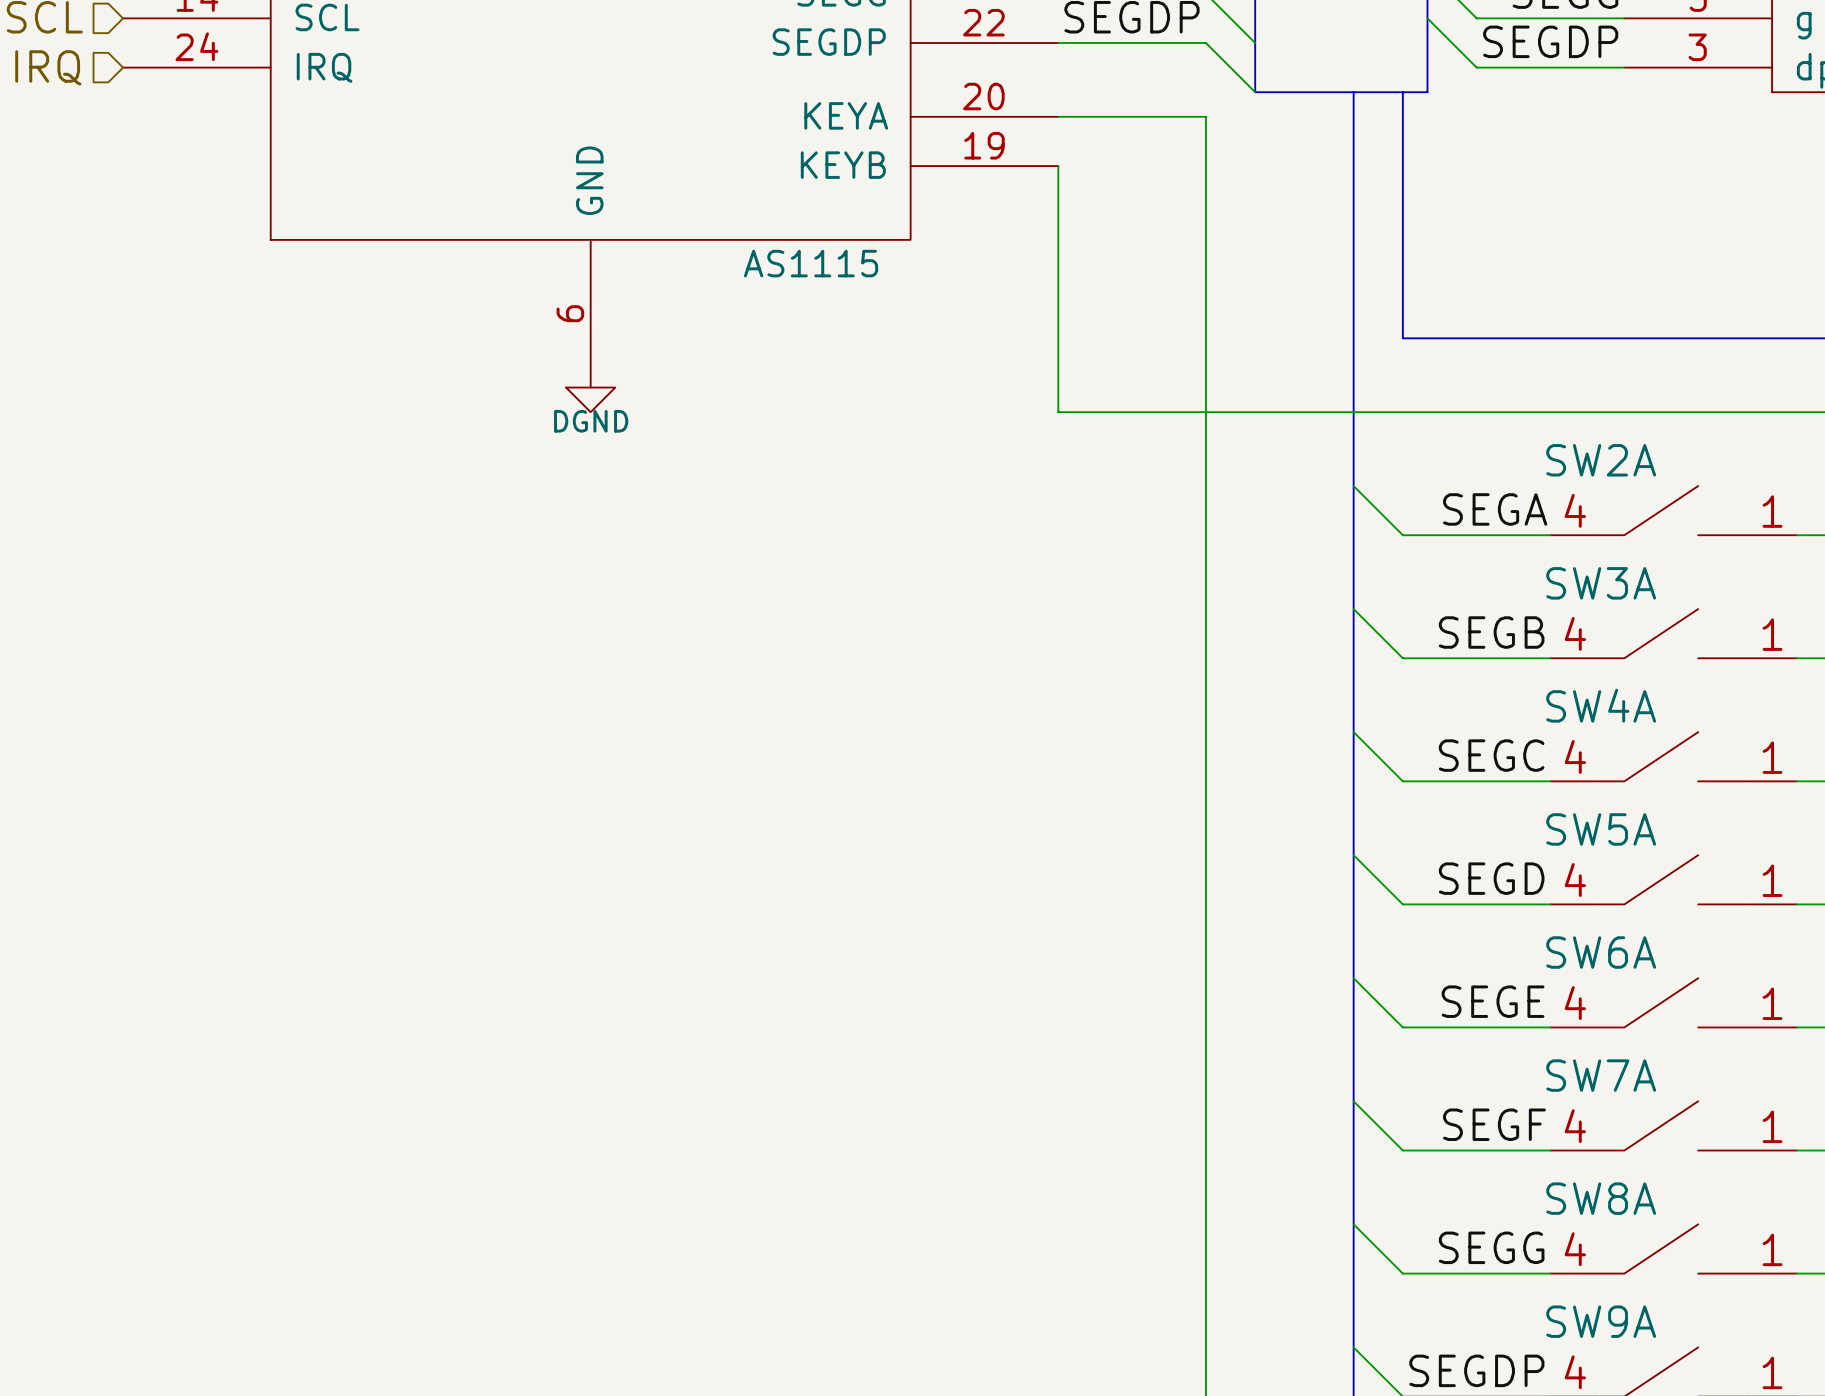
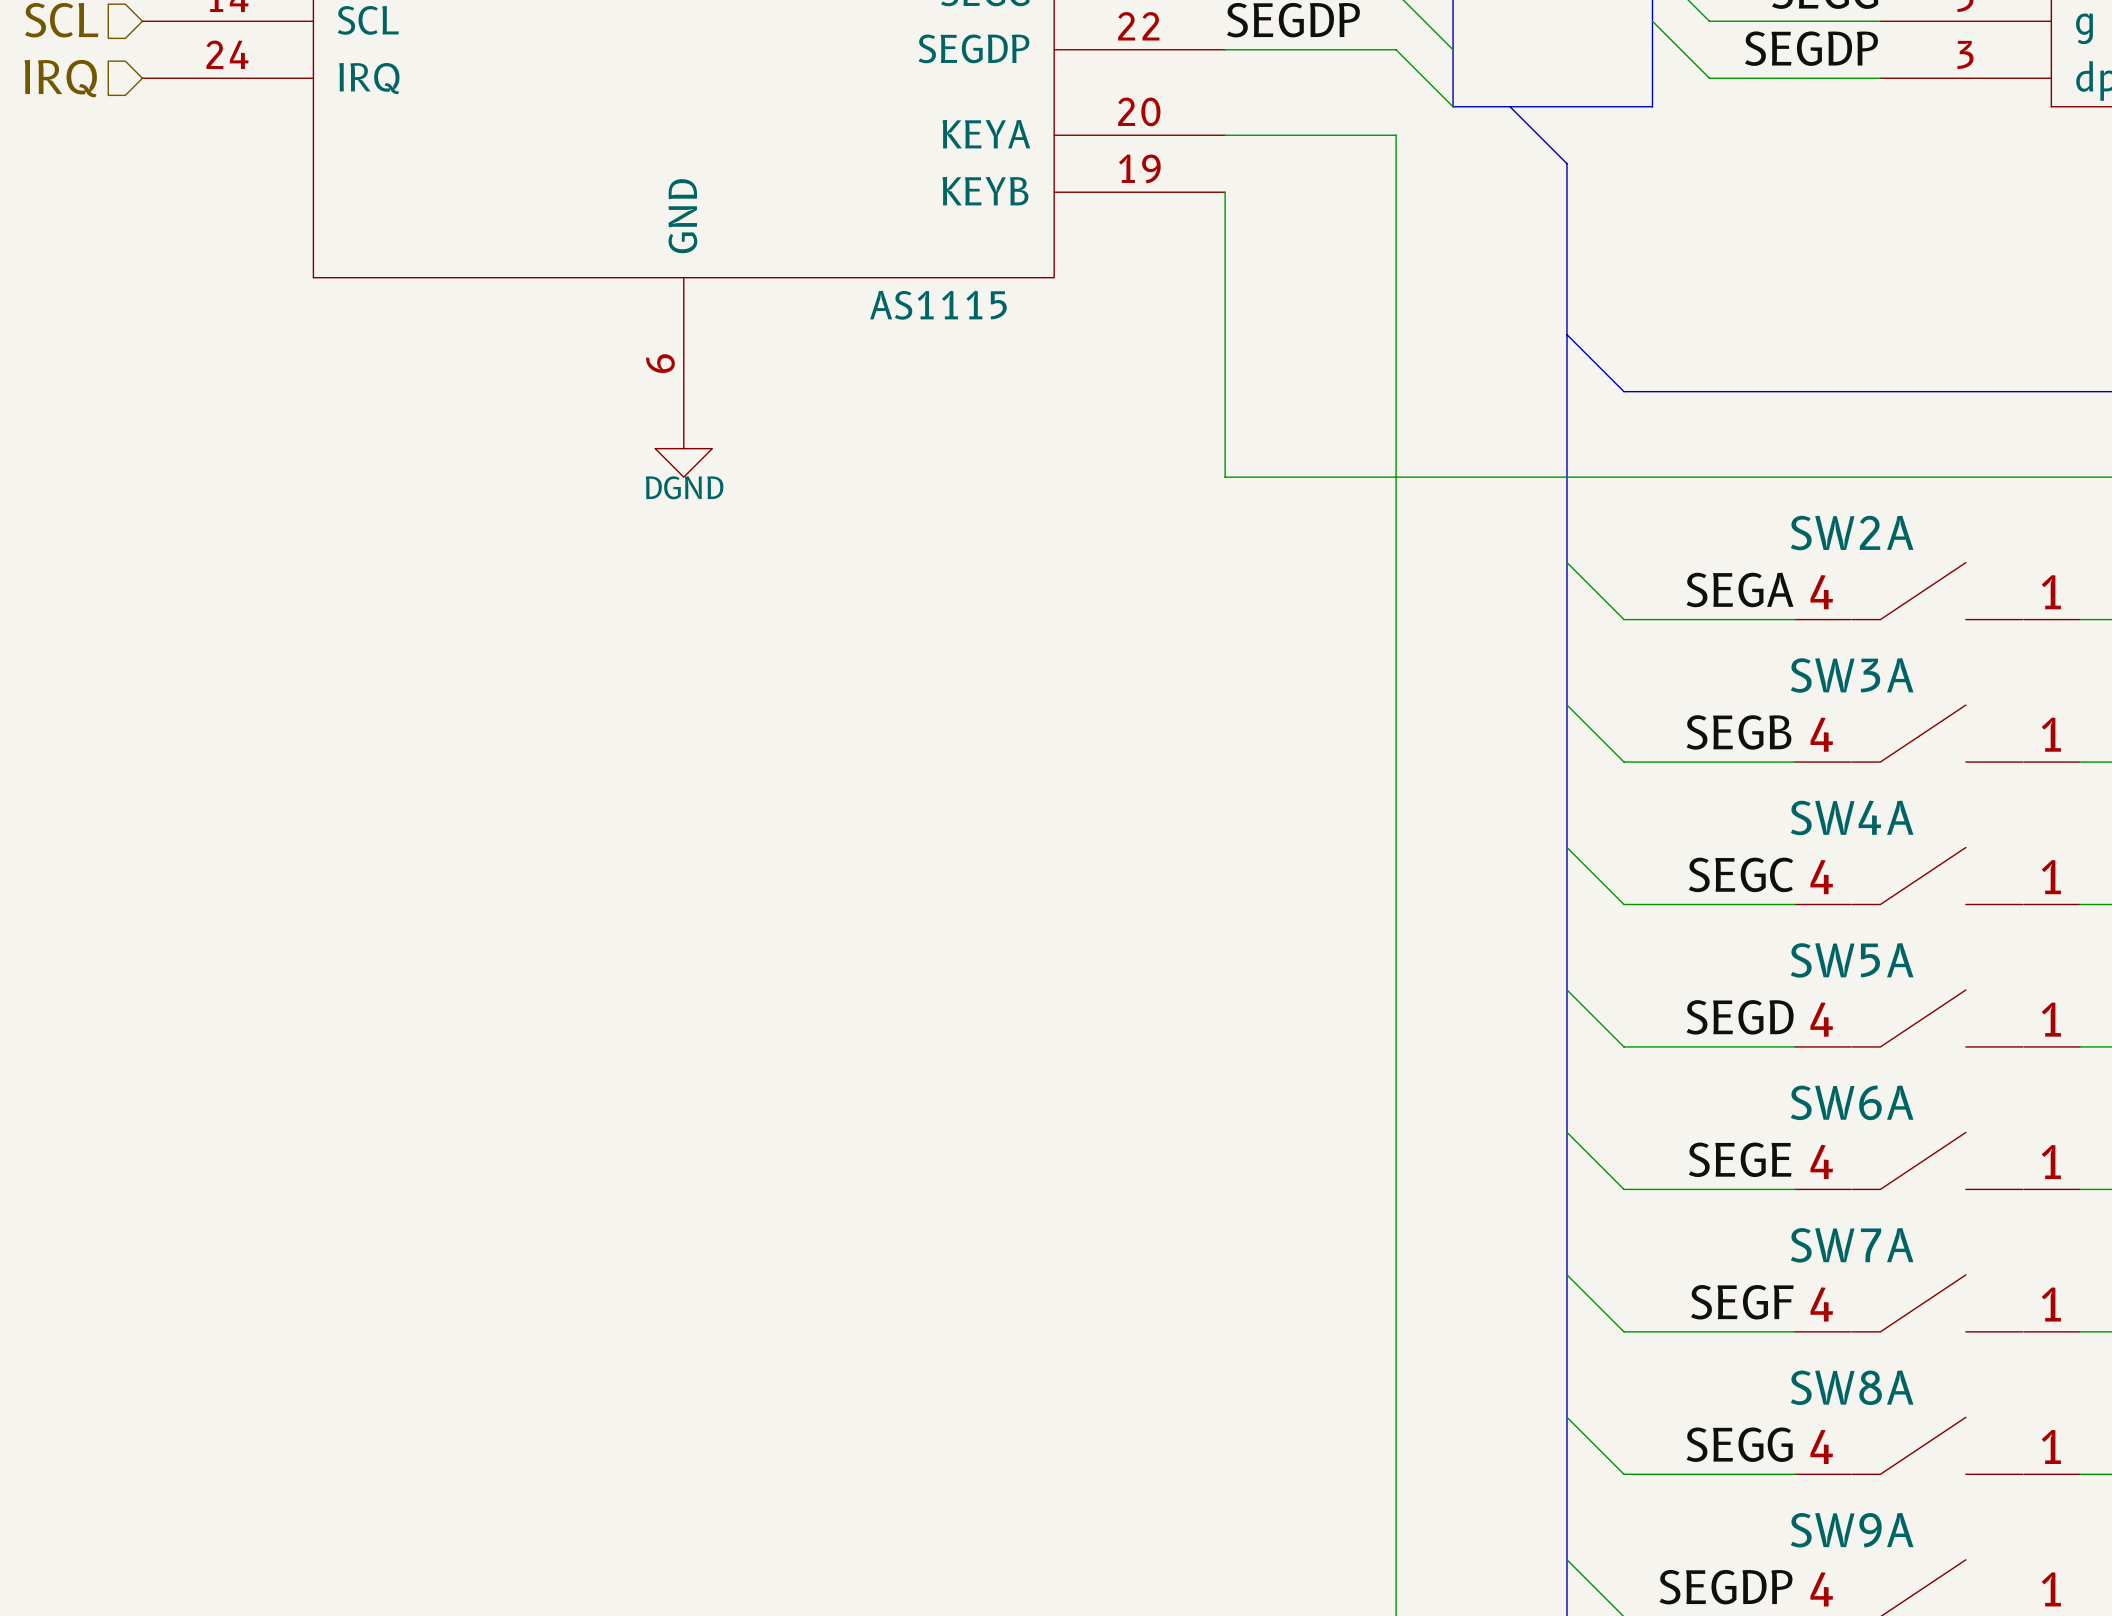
bus: (1353, 92) (1353, 141) -> (1510, 106) (1567, 163)
bus: (1402, 92) (1402, 338) -> (1567, 334) (1623, 391)

